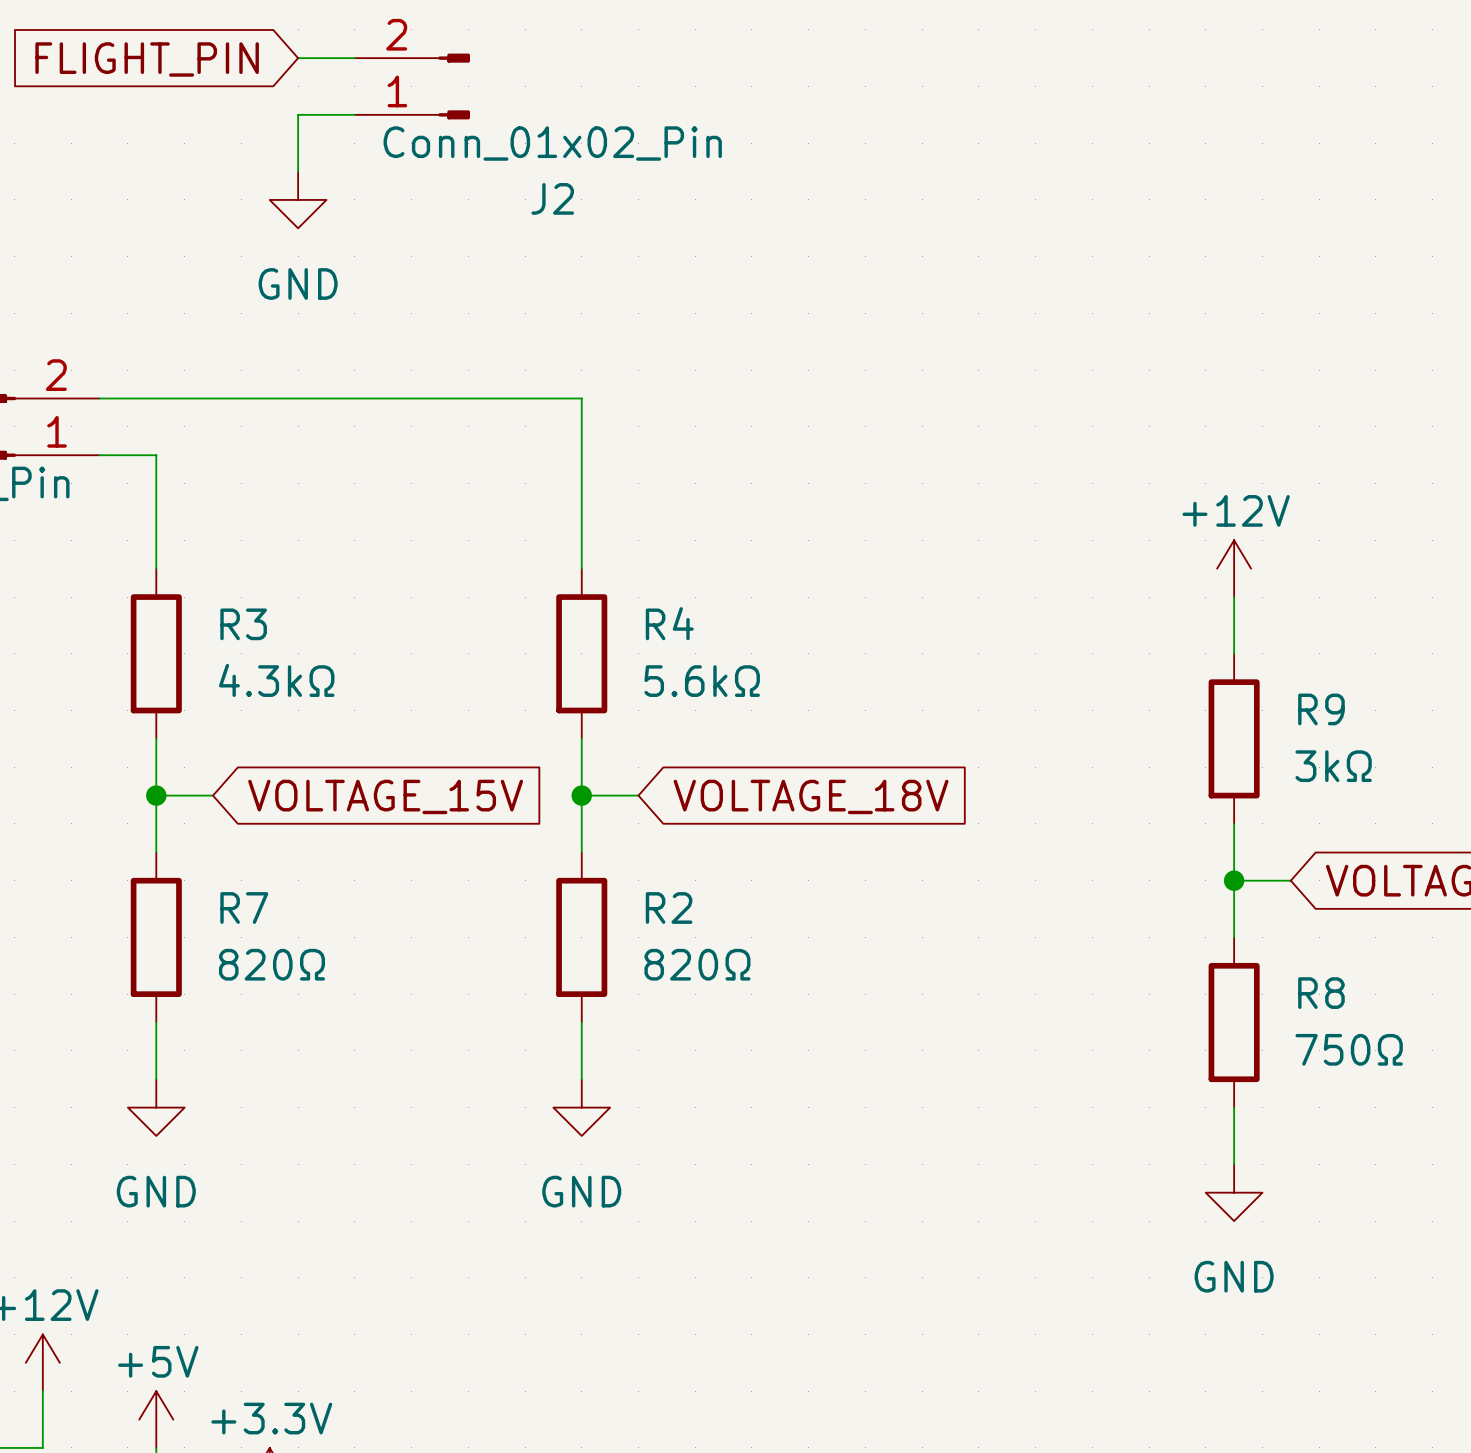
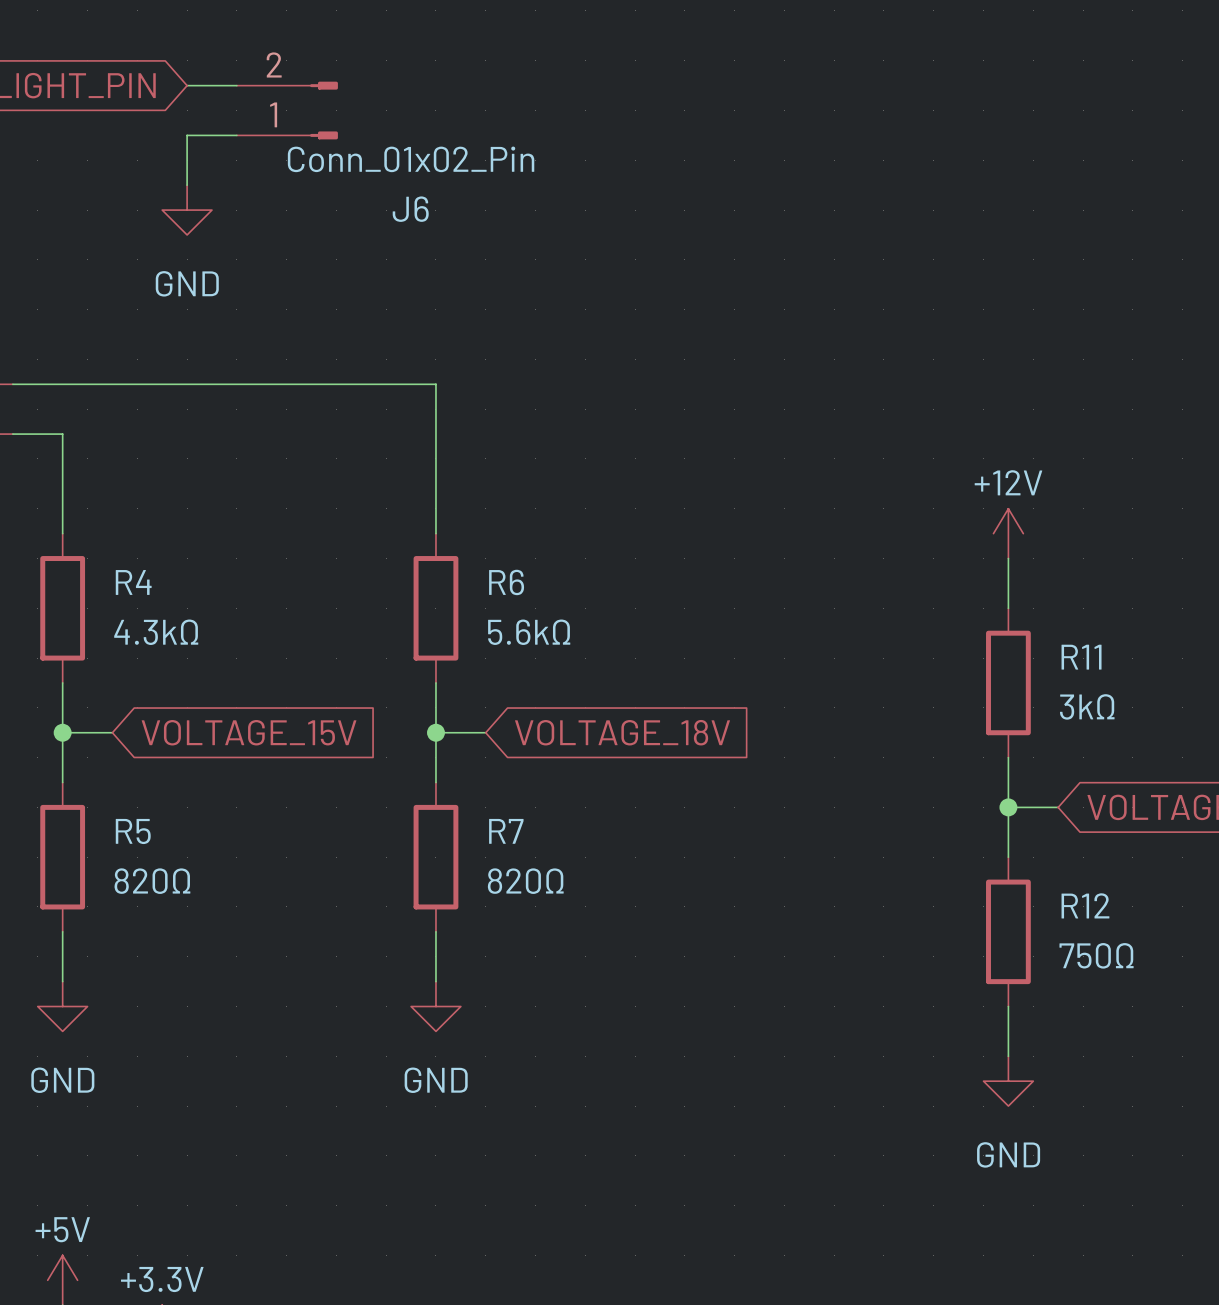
J2 name: J2 (552, 198) -> J6 (410, 209)
R4 name: R4 (669, 623) -> R6 (506, 582)
R3 name: R3 (243, 624) -> R4 (133, 582)
R9 name: R9 (1321, 709) -> R11 (1081, 657)
R7 name: R7 (244, 907) -> R5 (133, 831)
R2 name: R2 (669, 907) -> R7 (506, 831)
R8 name: R8 (1321, 993) -> R12 (1085, 905)

